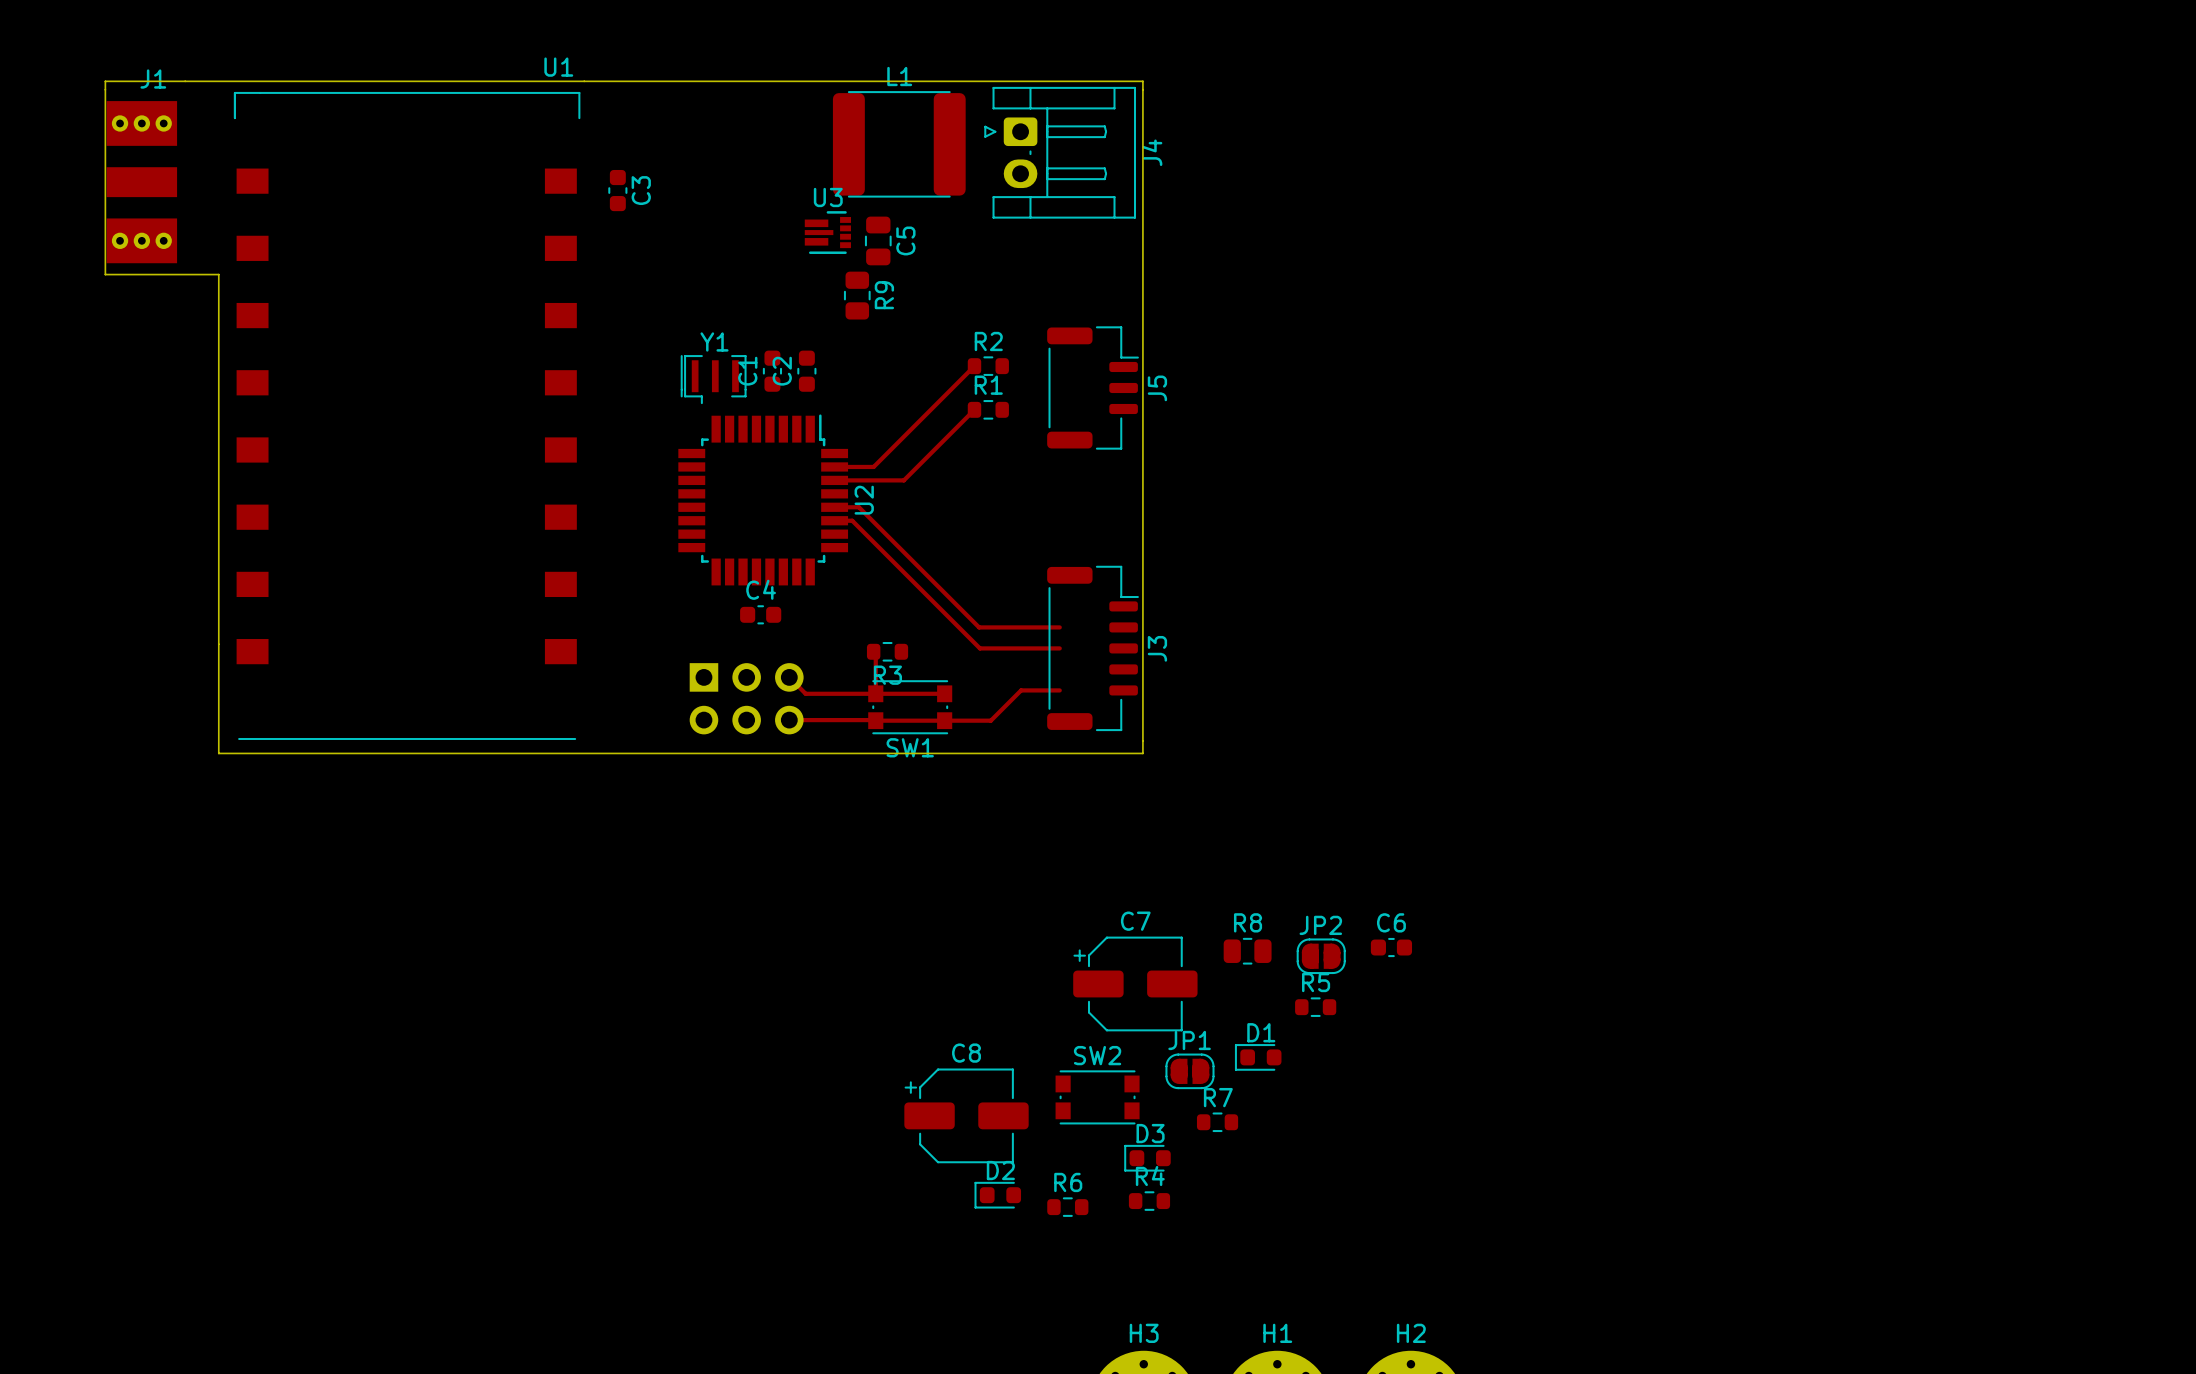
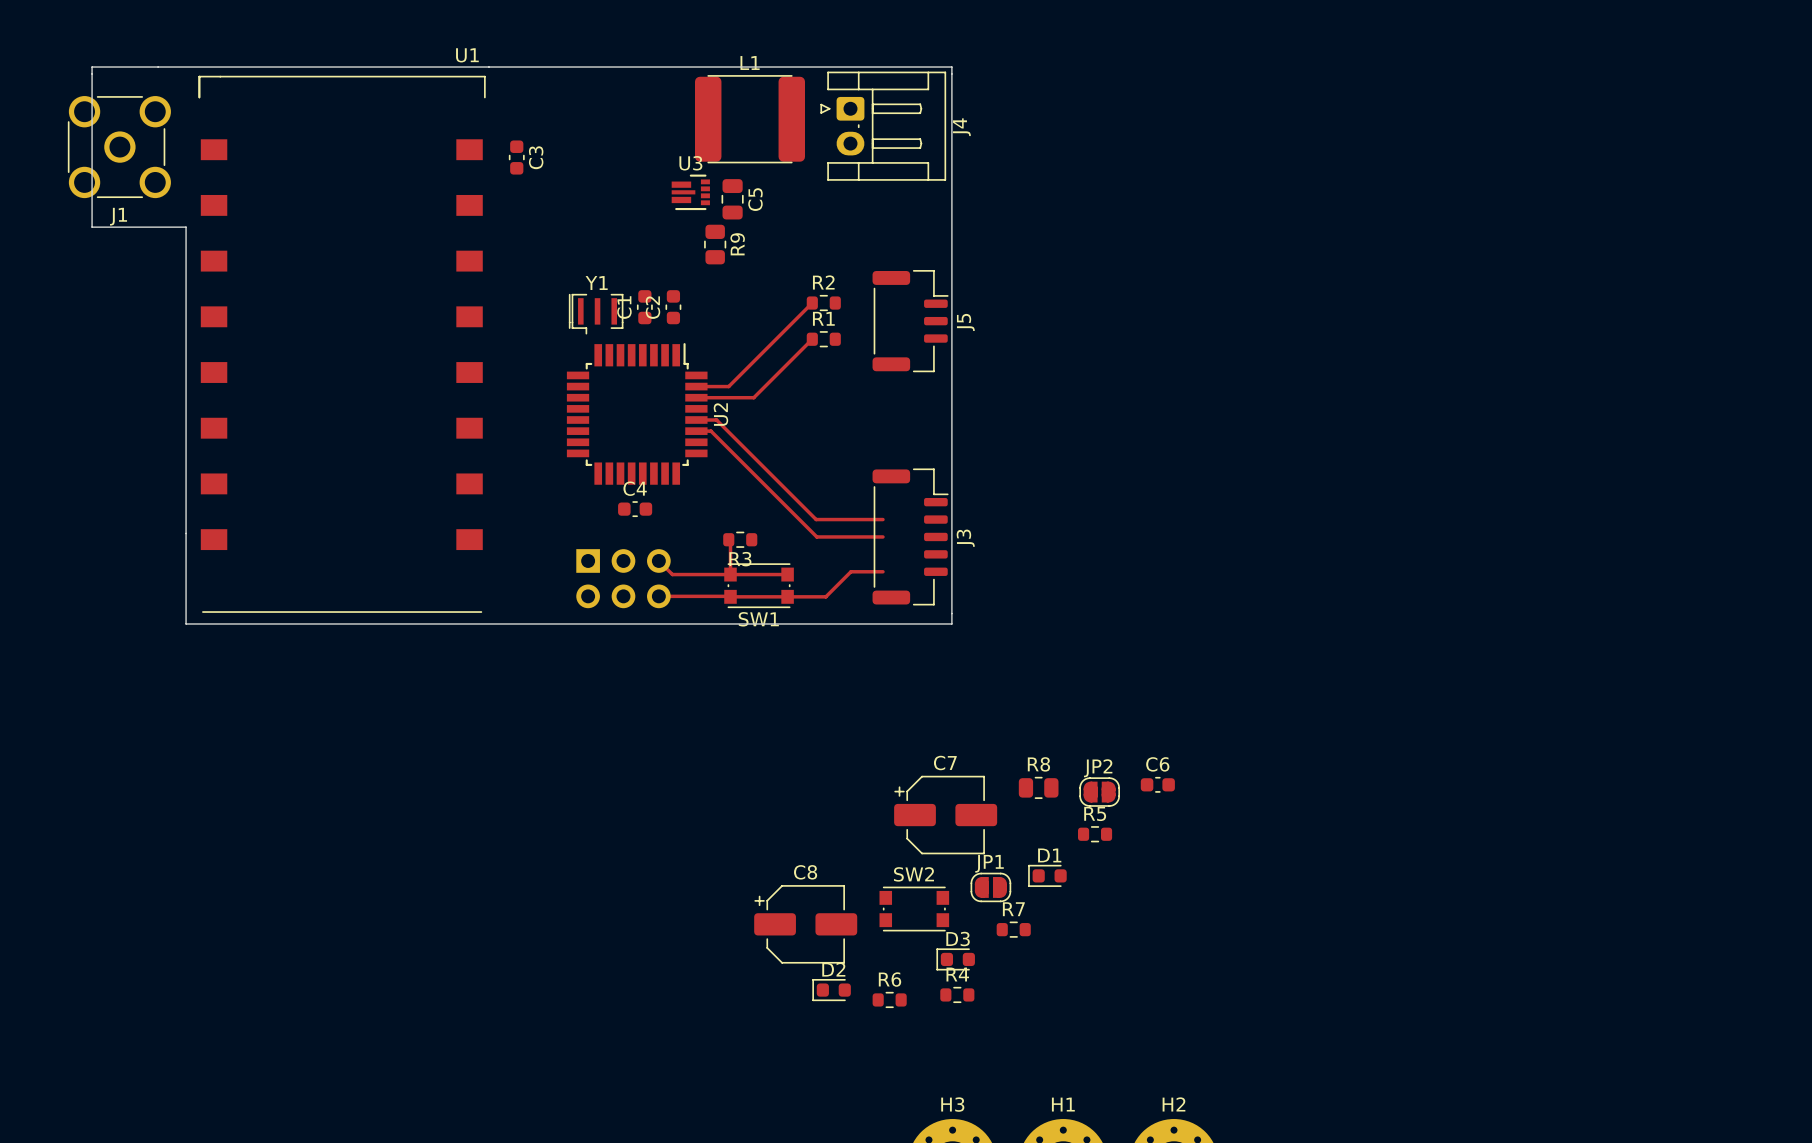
J1 name position: J1 (153, 79) -> J1 (118, 216)
J1 footprint: [106, 101, 178, 264] -> [67, 96, 171, 199]

